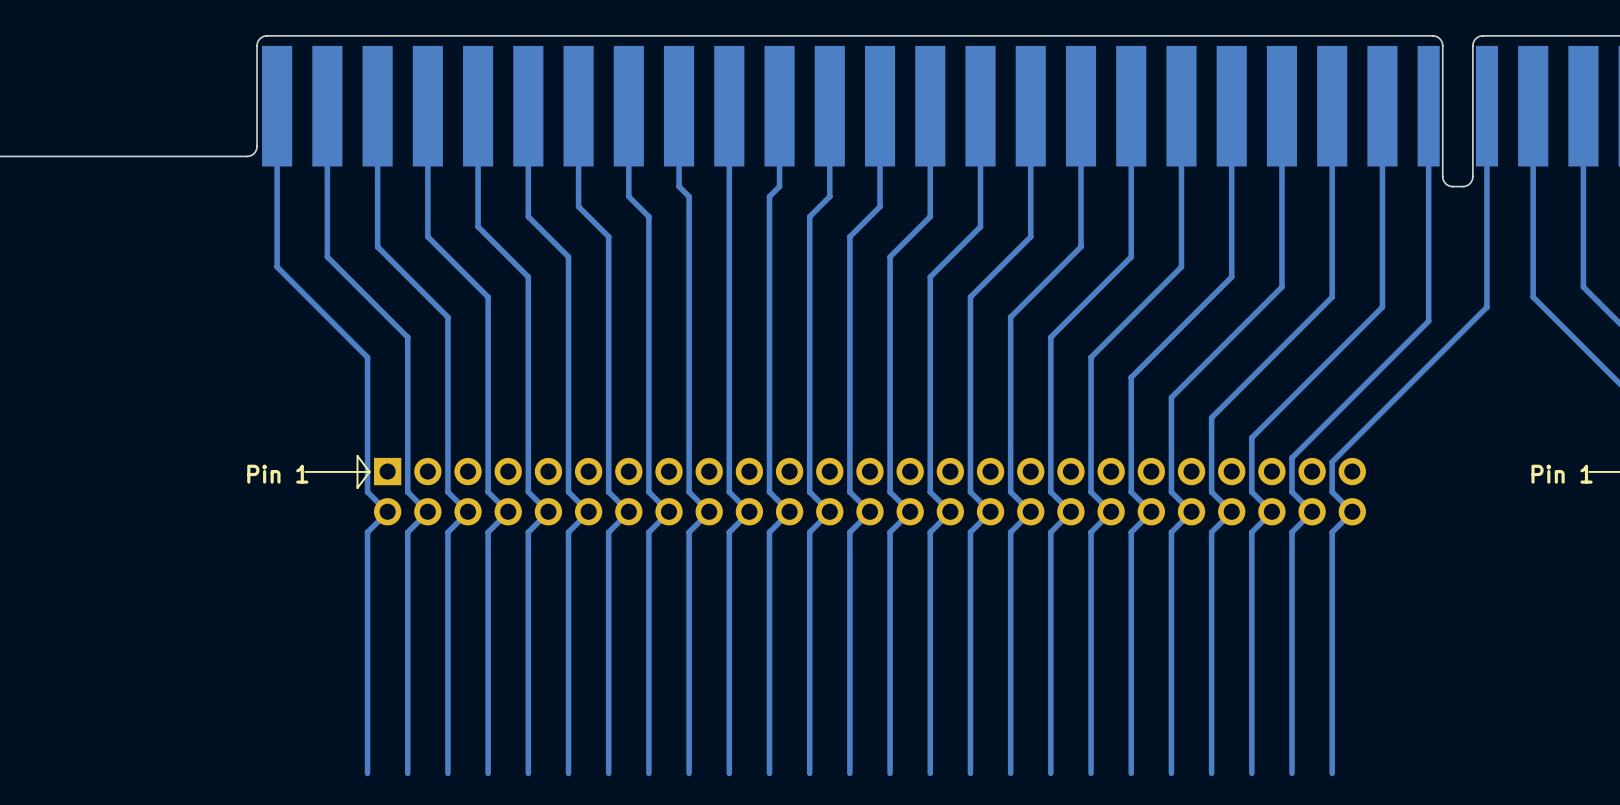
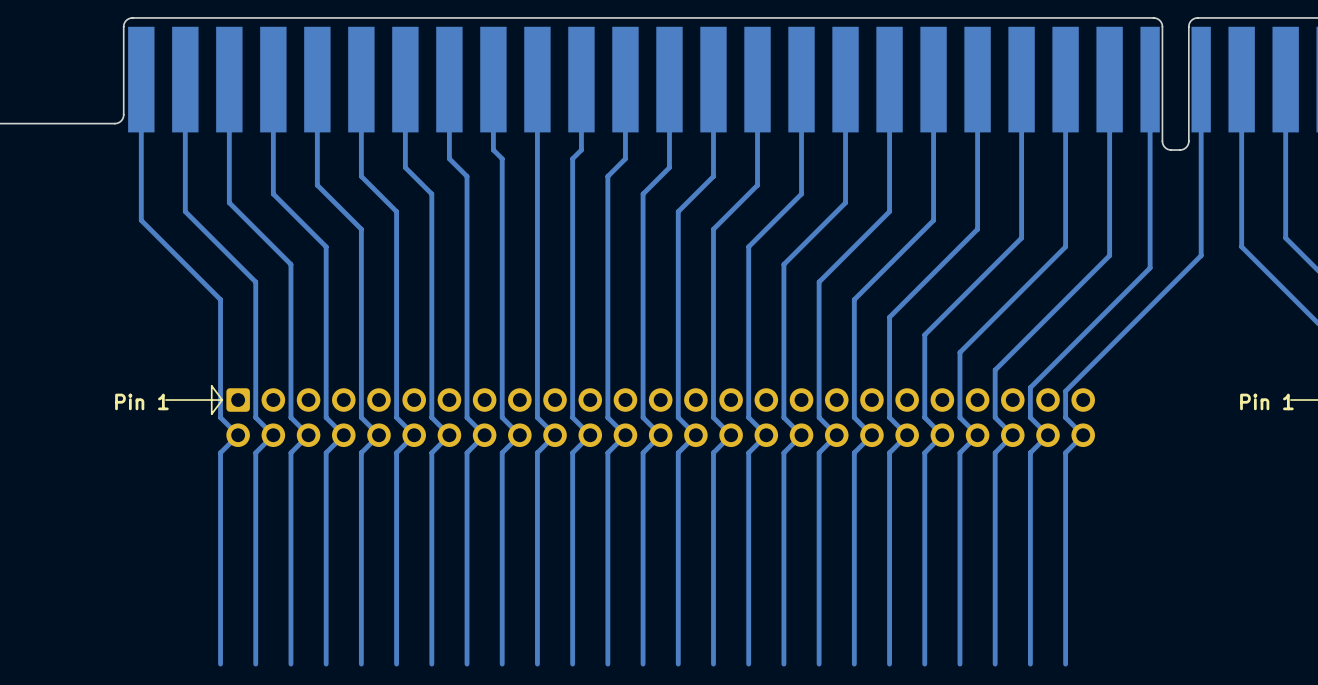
part footprint: [373, 457, 1366, 526] -> [226, 388, 1095, 448]

